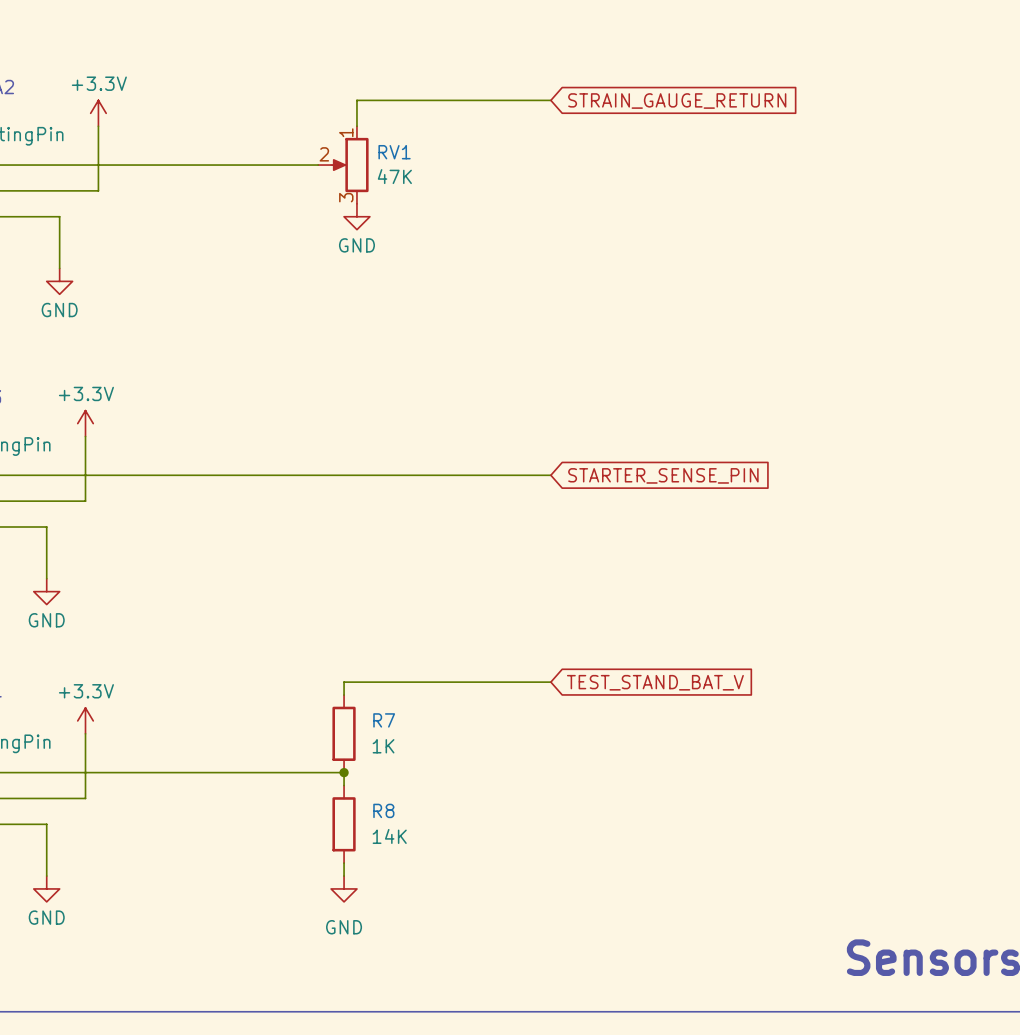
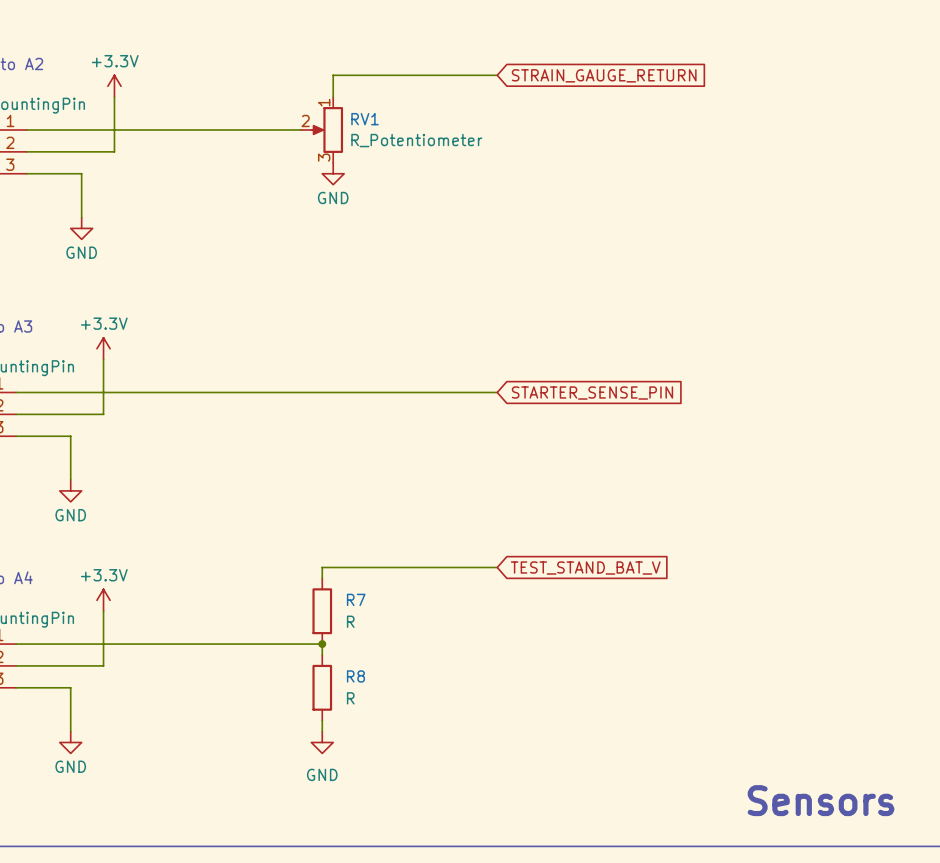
RV1 value: 47K (394, 176) -> R_Potentiometer (416, 140)
R7 value: 1K (383, 746) -> R (350, 621)
R8 value: 14K (389, 836) -> R (350, 698)

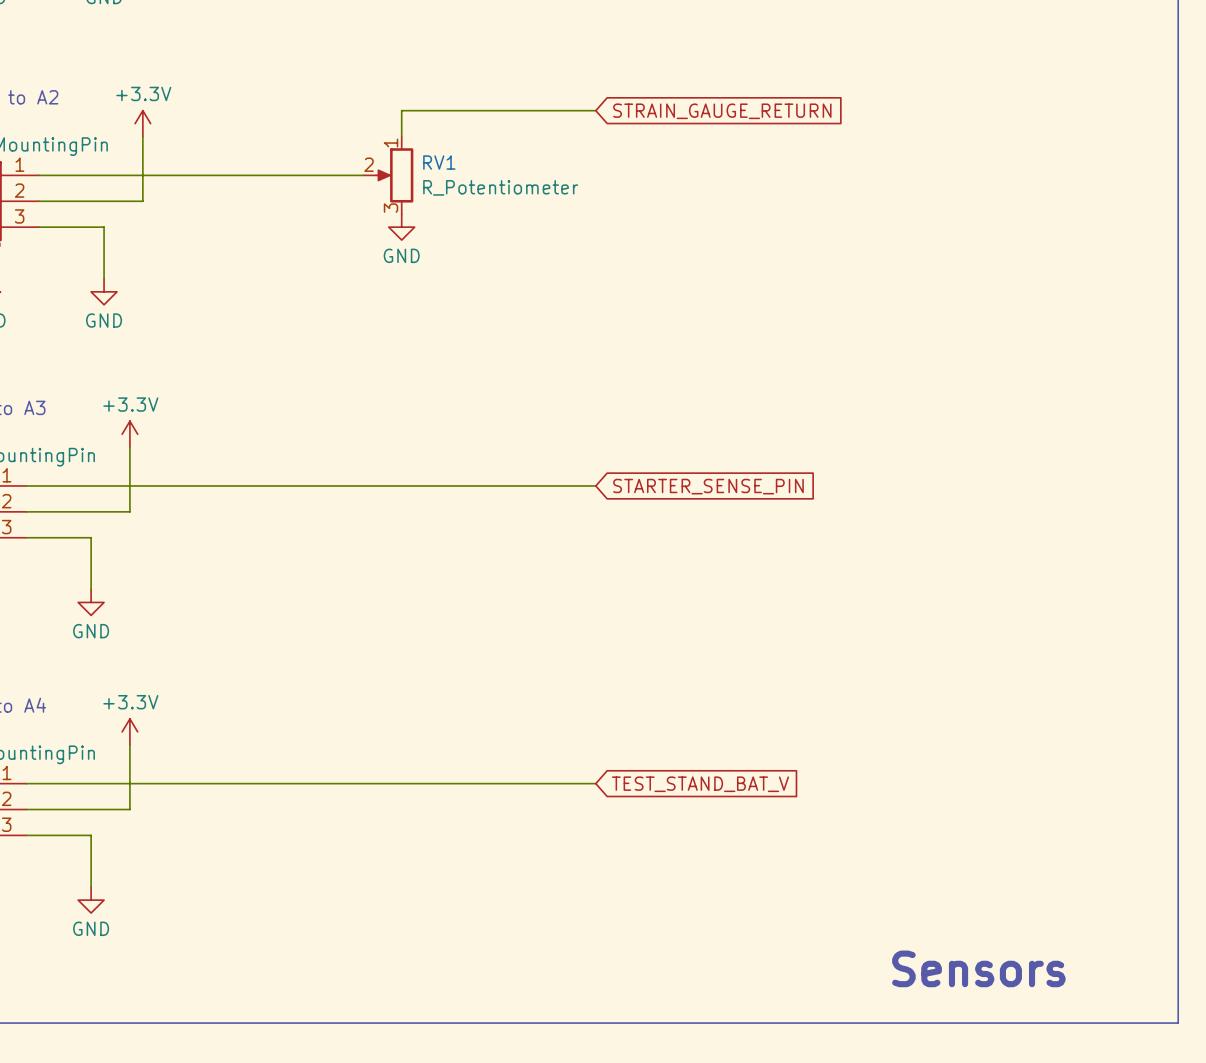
wire: (497, 567) (322, 567) (322, 578) -> none
global label position: TEST_STAND_BAT_V (585, 568) -> TEST_STAND_BAT_V (700, 784)
R7: R (322, 611) -> none
wire: (322, 644) (322, 654) -> (388, 783) (595, 783)
junction: (322, 644) -> none
R8: R (322, 687) -> none
wire: (322, 720) (322, 731) -> none
power symbol: GND (322, 742) -> none

